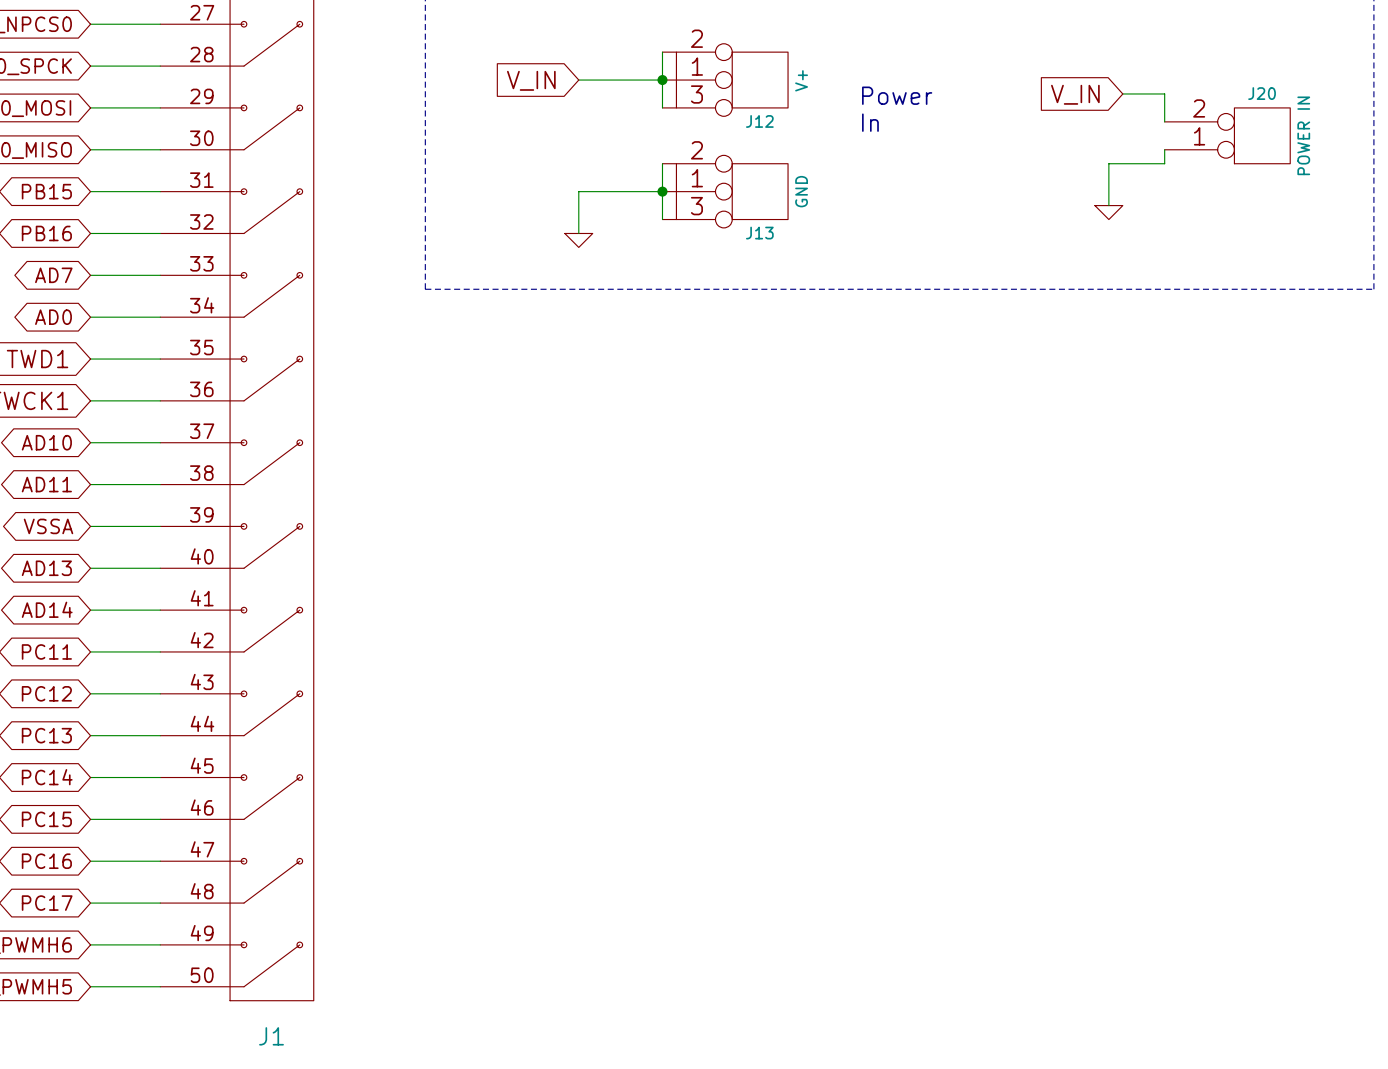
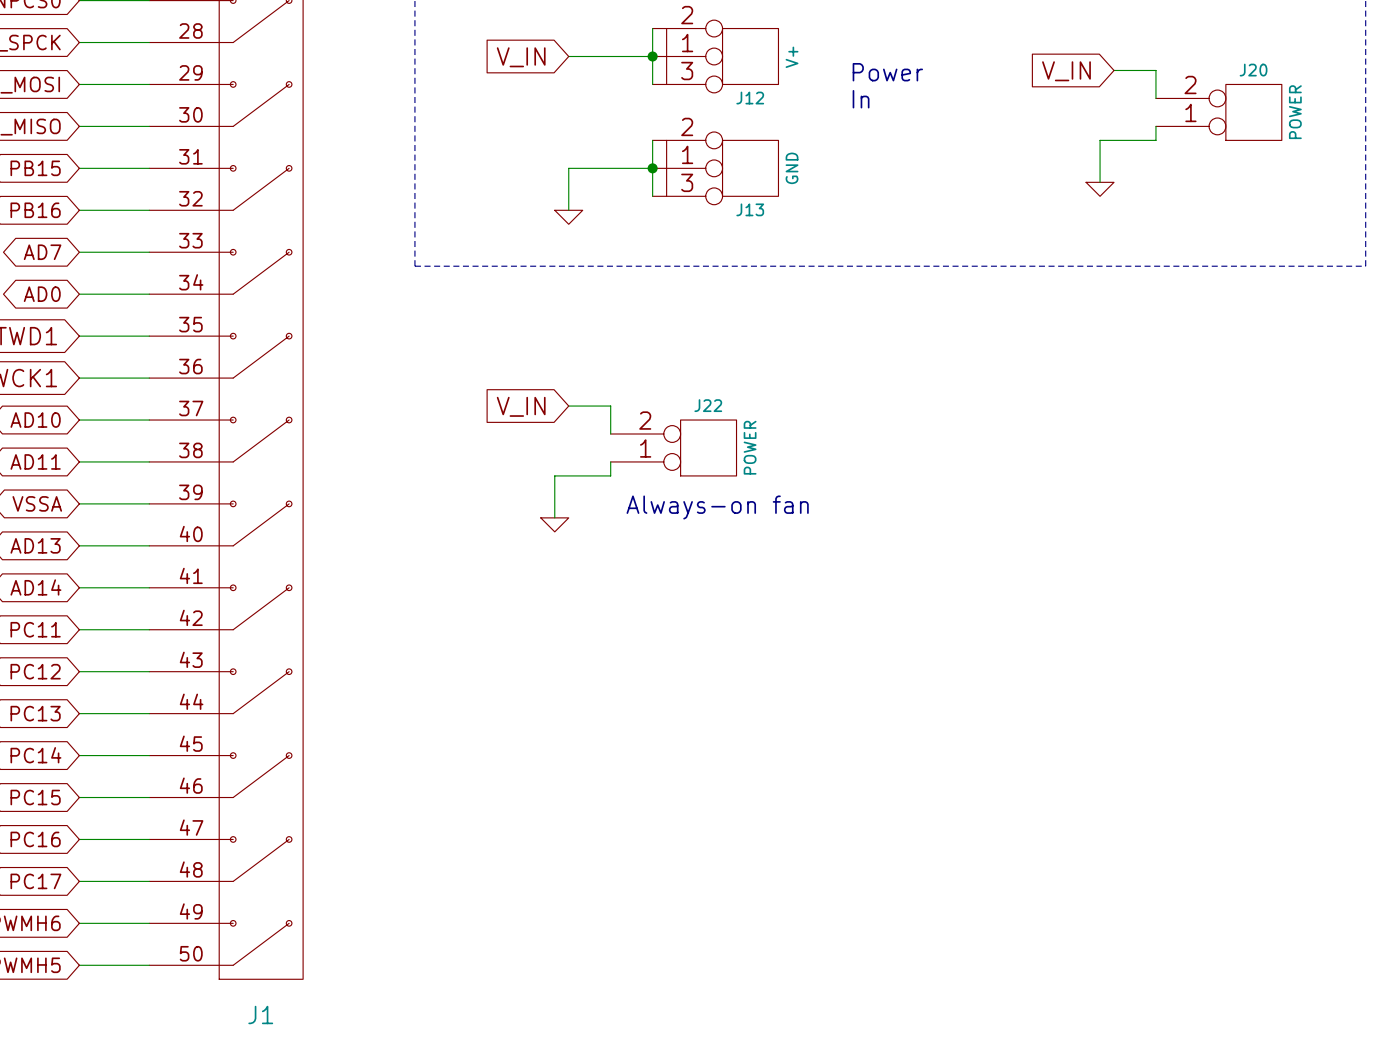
J20 value: POWER IN (1303, 135) -> POWER (1295, 112)
wire: none -> (568, 406) (610, 406) (610, 434)
global label: none -> V_IN (521, 406)
J22: none -> POWER (673, 447)
wire: none -> (610, 461) (610, 475) (554, 475) (554, 517)
text: none -> Always-on fan (717, 507)
power symbol: none -> (554, 524)

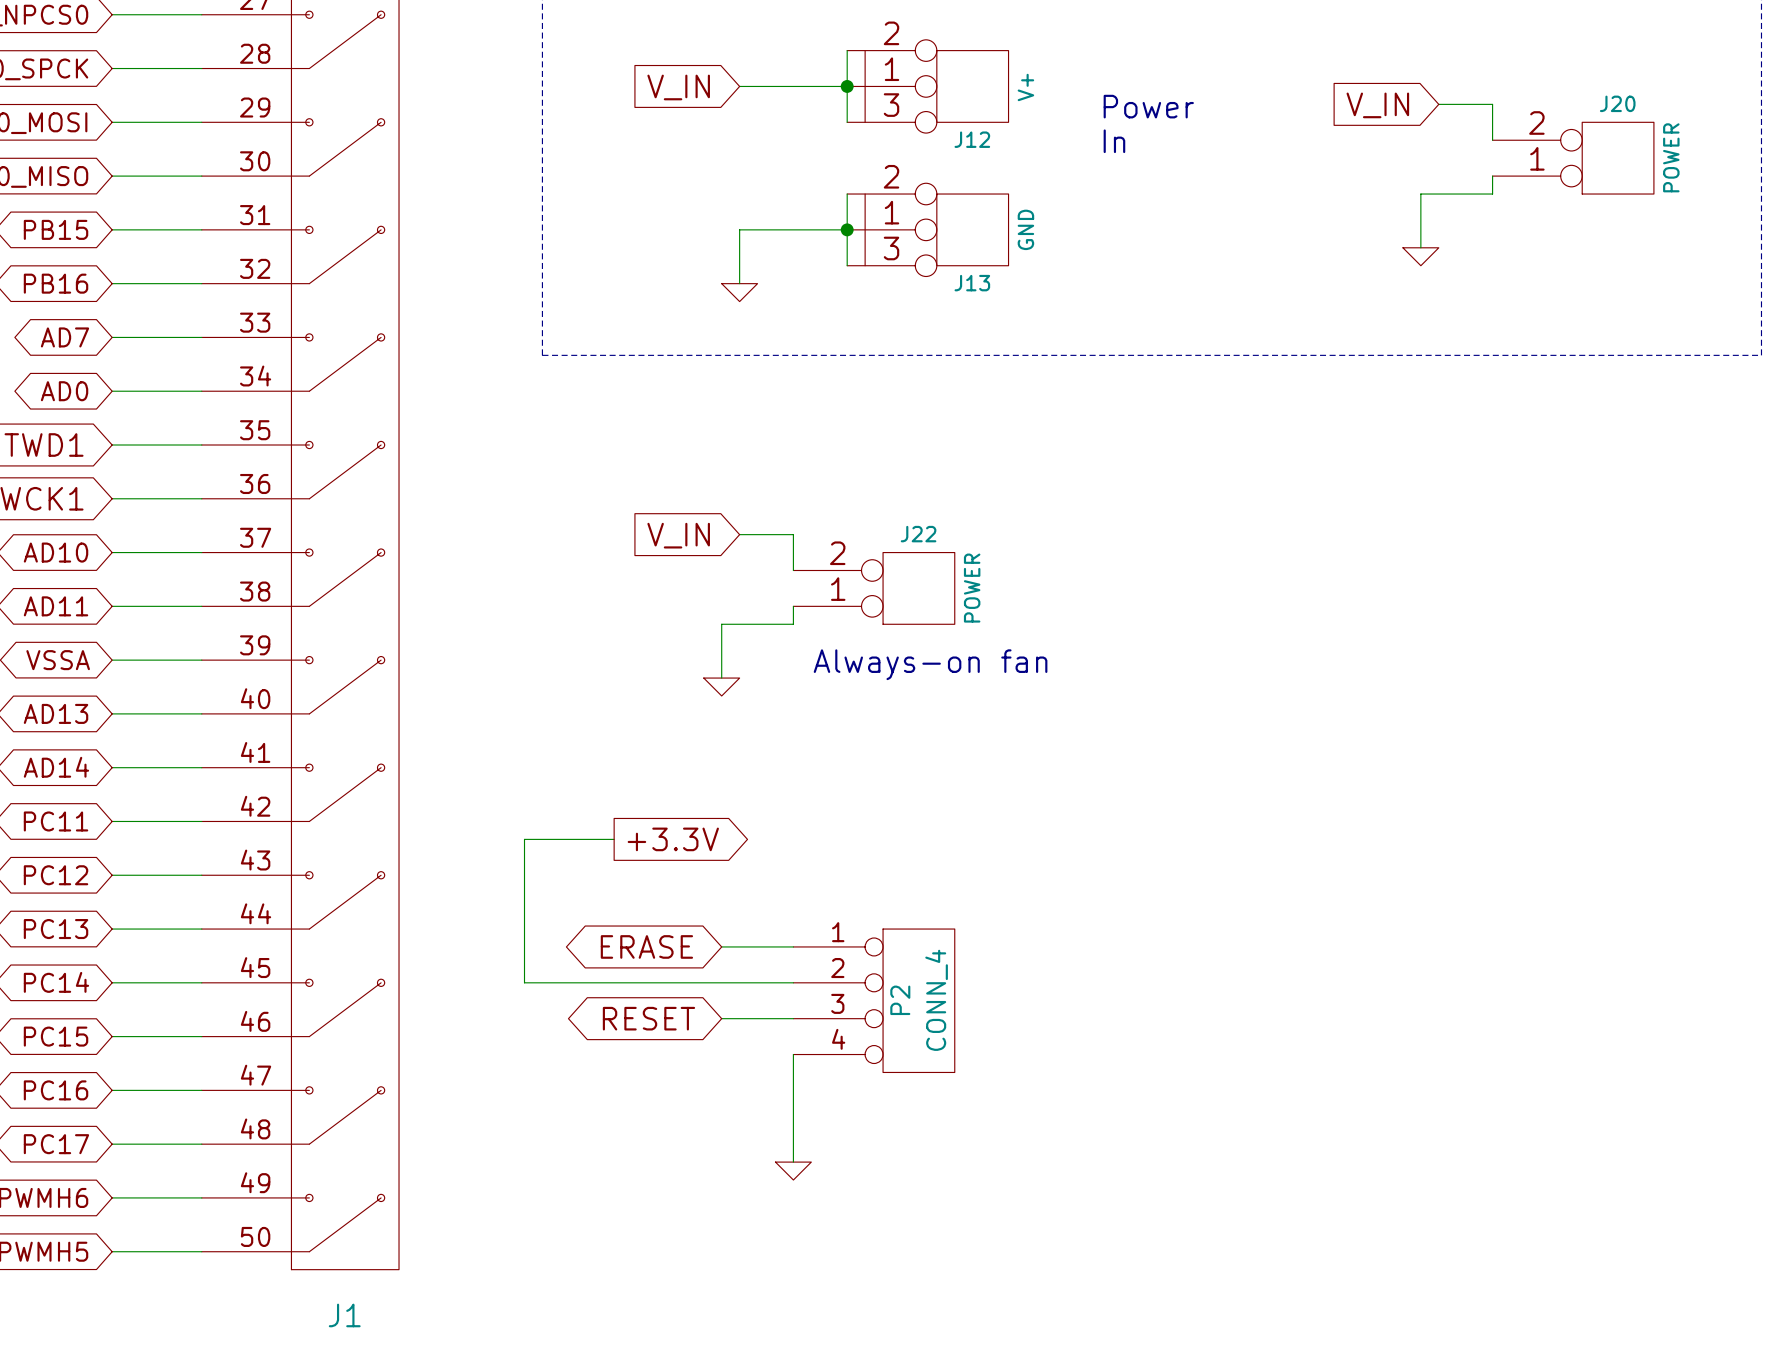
wire: none -> (614, 839) (524, 839) (524, 982) (793, 982)
global label: none -> +3.3V (673, 839)
global label: none -> ERASE (646, 946)
wire: none -> (721, 946) (793, 946)
P2: none -> CONN_4 (874, 1000)
global label: none -> RESET (648, 1018)
wire: none -> (721, 1018) (793, 1018)
wire: none -> (793, 1054) (793, 1162)
power symbol: none -> (793, 1171)

